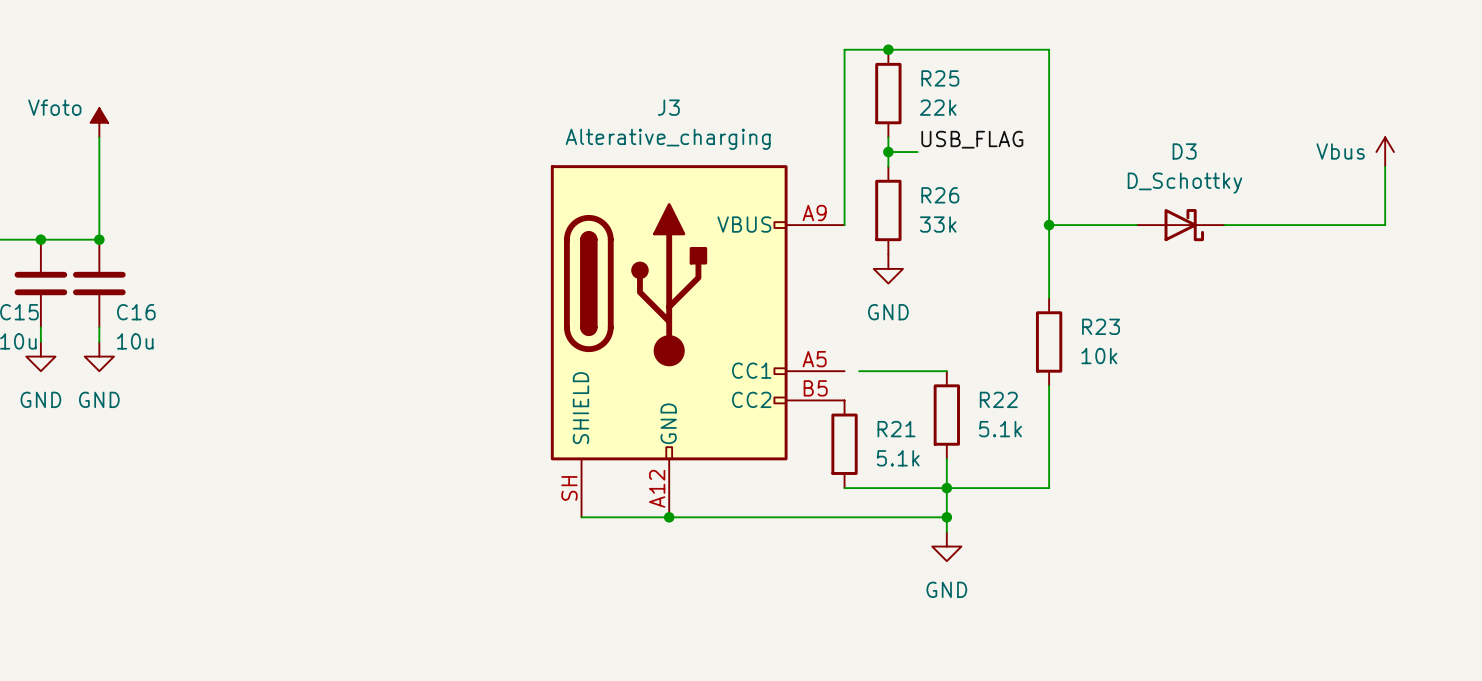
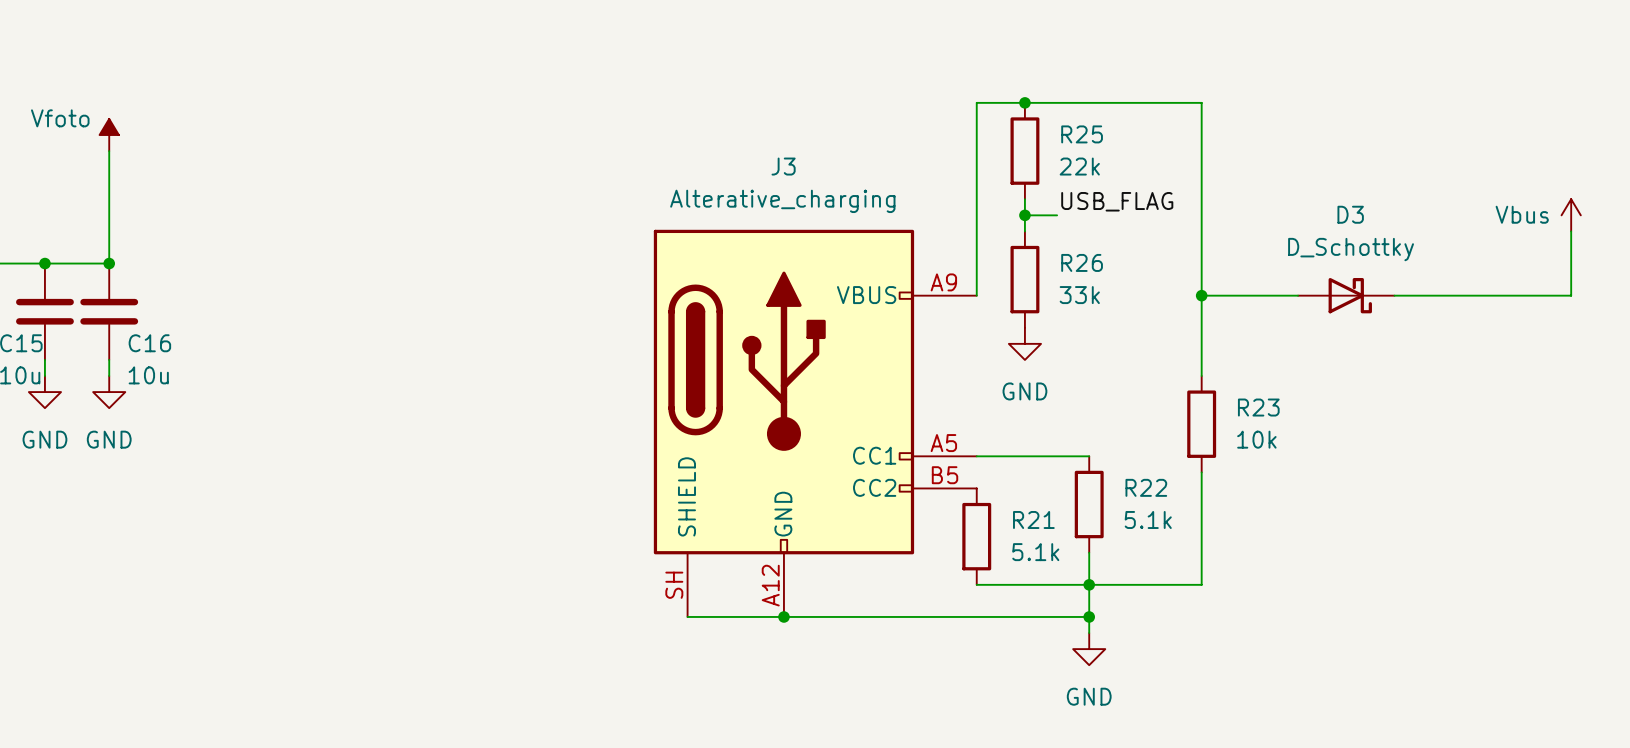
junction: (888, 49) -> none
R25 position: (888, 93) -> (1024, 151)
junction: none -> (1024, 102)
wire: none -> (976, 151) (976, 102) (1201, 102) (1201, 376)
label position: USB_FLAG (972, 139) -> USB_FLAG (1117, 201)
wire: (888, 152) (917, 152) -> (1024, 215) (1057, 215)
junction: (888, 152) -> none
power symbol position: Vbus (1385, 152) -> Vbus (1571, 215)
wire: none -> (976, 183) (976, 295)
wire: (1385, 166) (1385, 225) (1224, 225) -> (1571, 231) (1571, 295) (1394, 295)
wire: none -> (1024, 199) (1024, 231)
junction: none -> (1024, 215)
R26 position: (888, 210) -> (1024, 279)
wire: (844, 225) (844, 49) (1049, 49) (1049, 298) -> none
wire: (1049, 225) (1136, 225) -> (1201, 295) (1298, 295)
junction: (1049, 225) -> none
D3 position: (1180, 225) -> (1346, 295)
power symbol position: GND (888, 268) -> GND (1024, 343)
junction: none -> (1201, 295)
J3 position: (697, 341) -> (815, 423)
R23 position: (1049, 341) -> (1201, 424)
wire: (859, 371) (946, 371) -> none
wire: (1049, 385) (1049, 488) (844, 488) -> (1201, 472) (1201, 584) (976, 584)
wire: none -> (976, 456) (1089, 456)
R22 position: (946, 415) -> (1089, 504)
R21 position: (844, 444) -> (976, 536)
wire: (946, 458) (946, 531) -> (1089, 552) (1089, 633)
junction: (946, 488) -> none
wire: (581, 517) (946, 517) -> (687, 616) (1089, 616)
junction position: (669, 517) -> (783, 616)
junction: (946, 517) -> none
junction: none -> (1089, 584)
power symbol position: GND (946, 546) -> GND (1089, 649)
junction: none -> (1089, 616)

